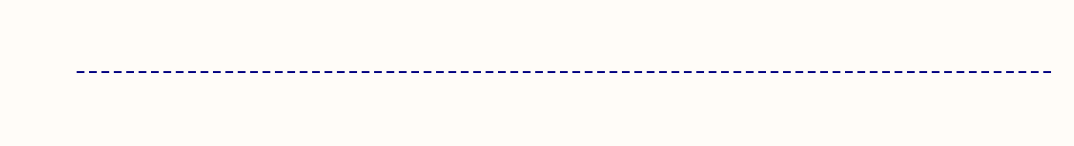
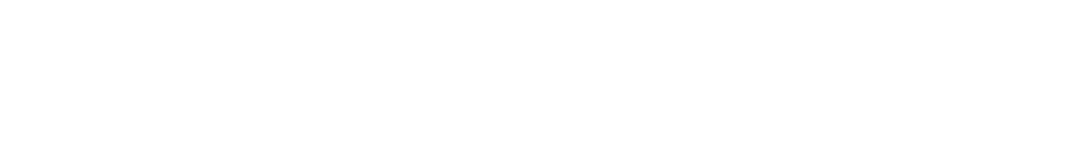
line: (73, 72) (1051, 72) -> none

